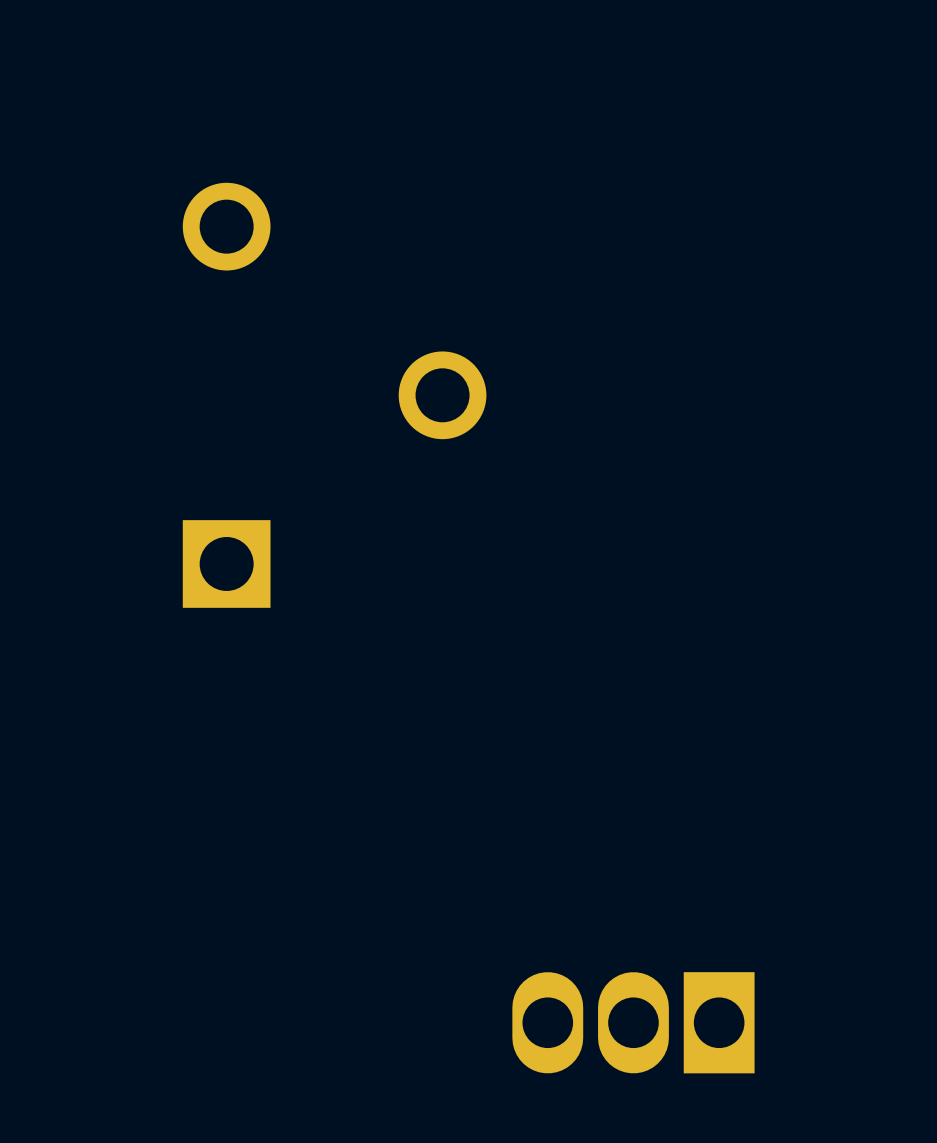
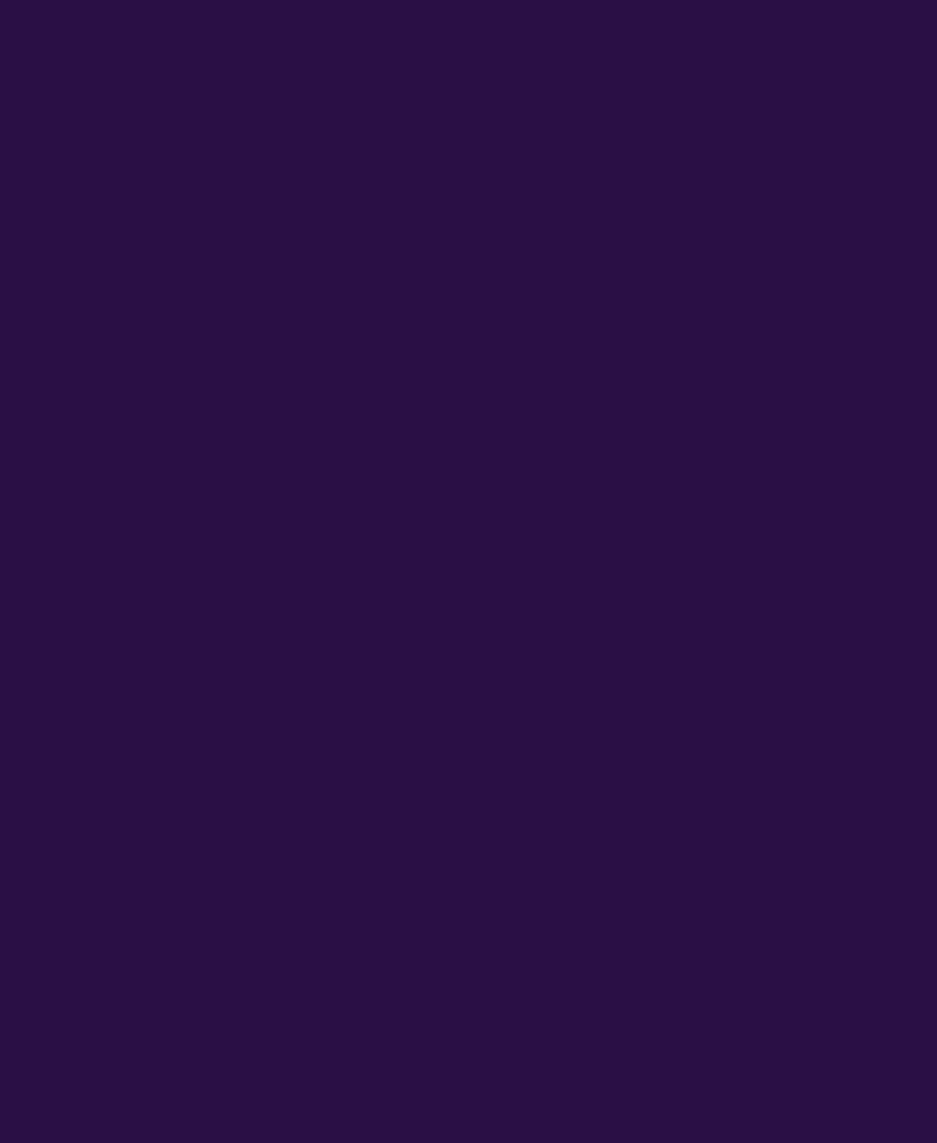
part: (334, 395) -> none
part: (633, 1022) -> none

